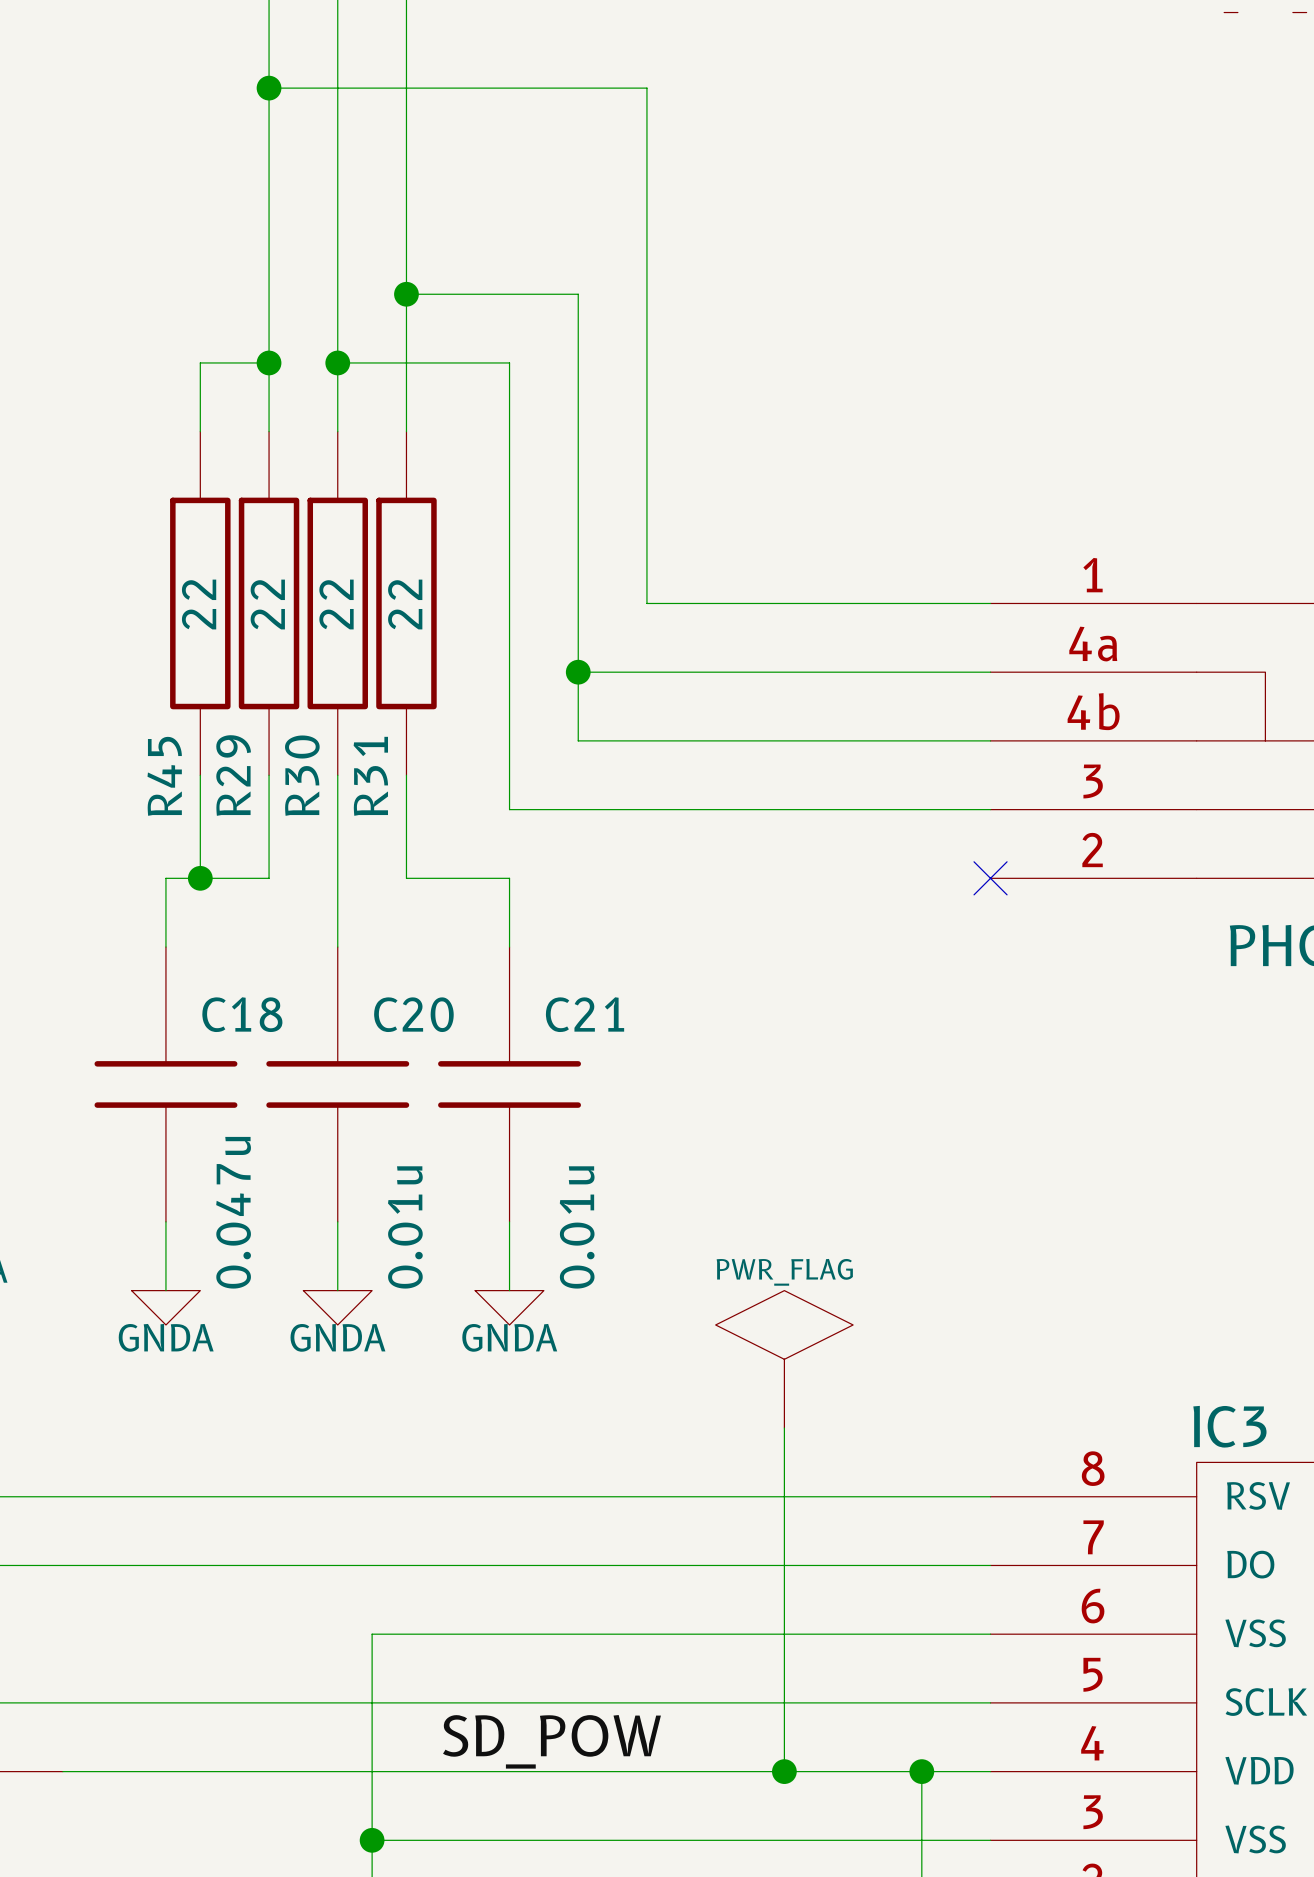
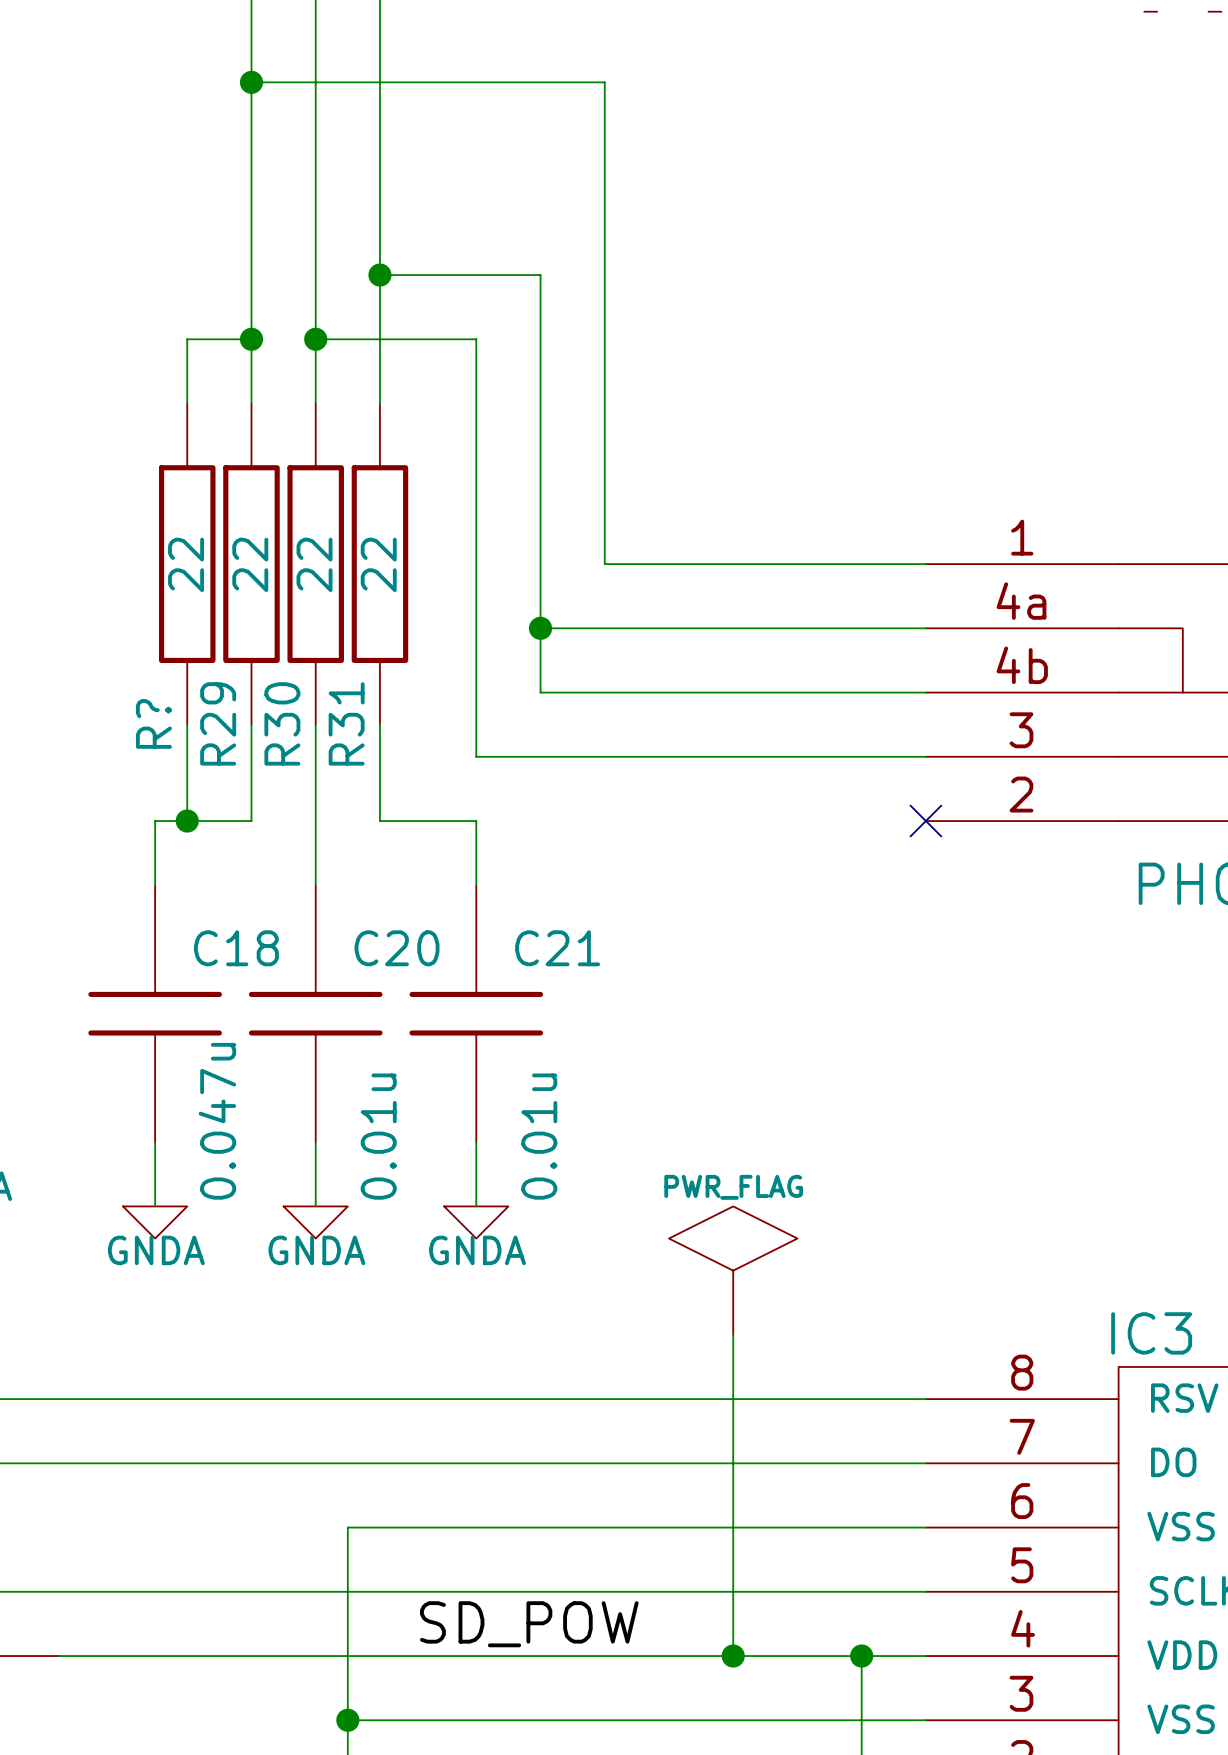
R45 name: R45 (164, 776) -> R? (153, 723)

